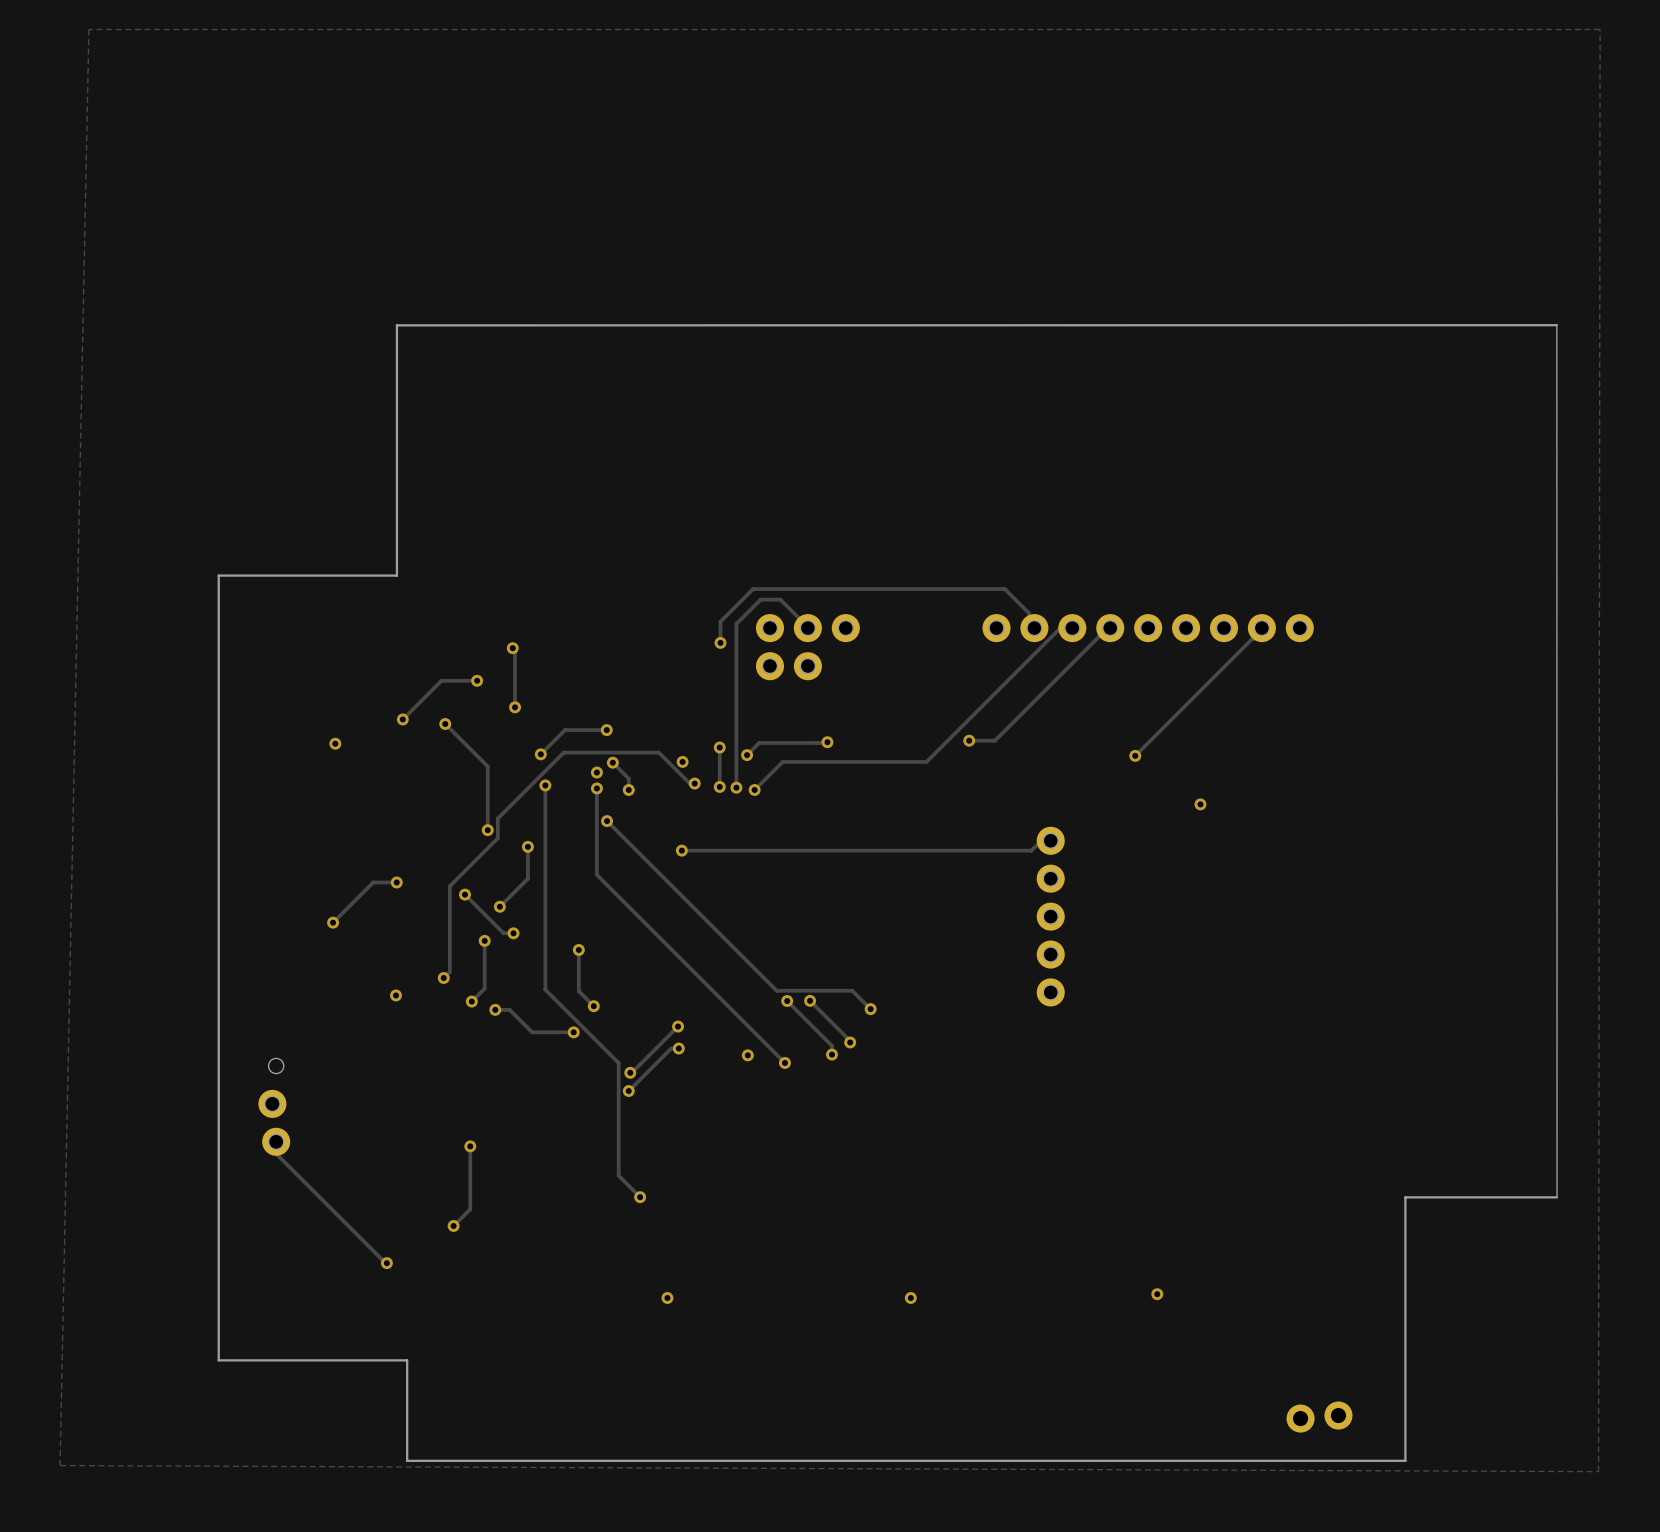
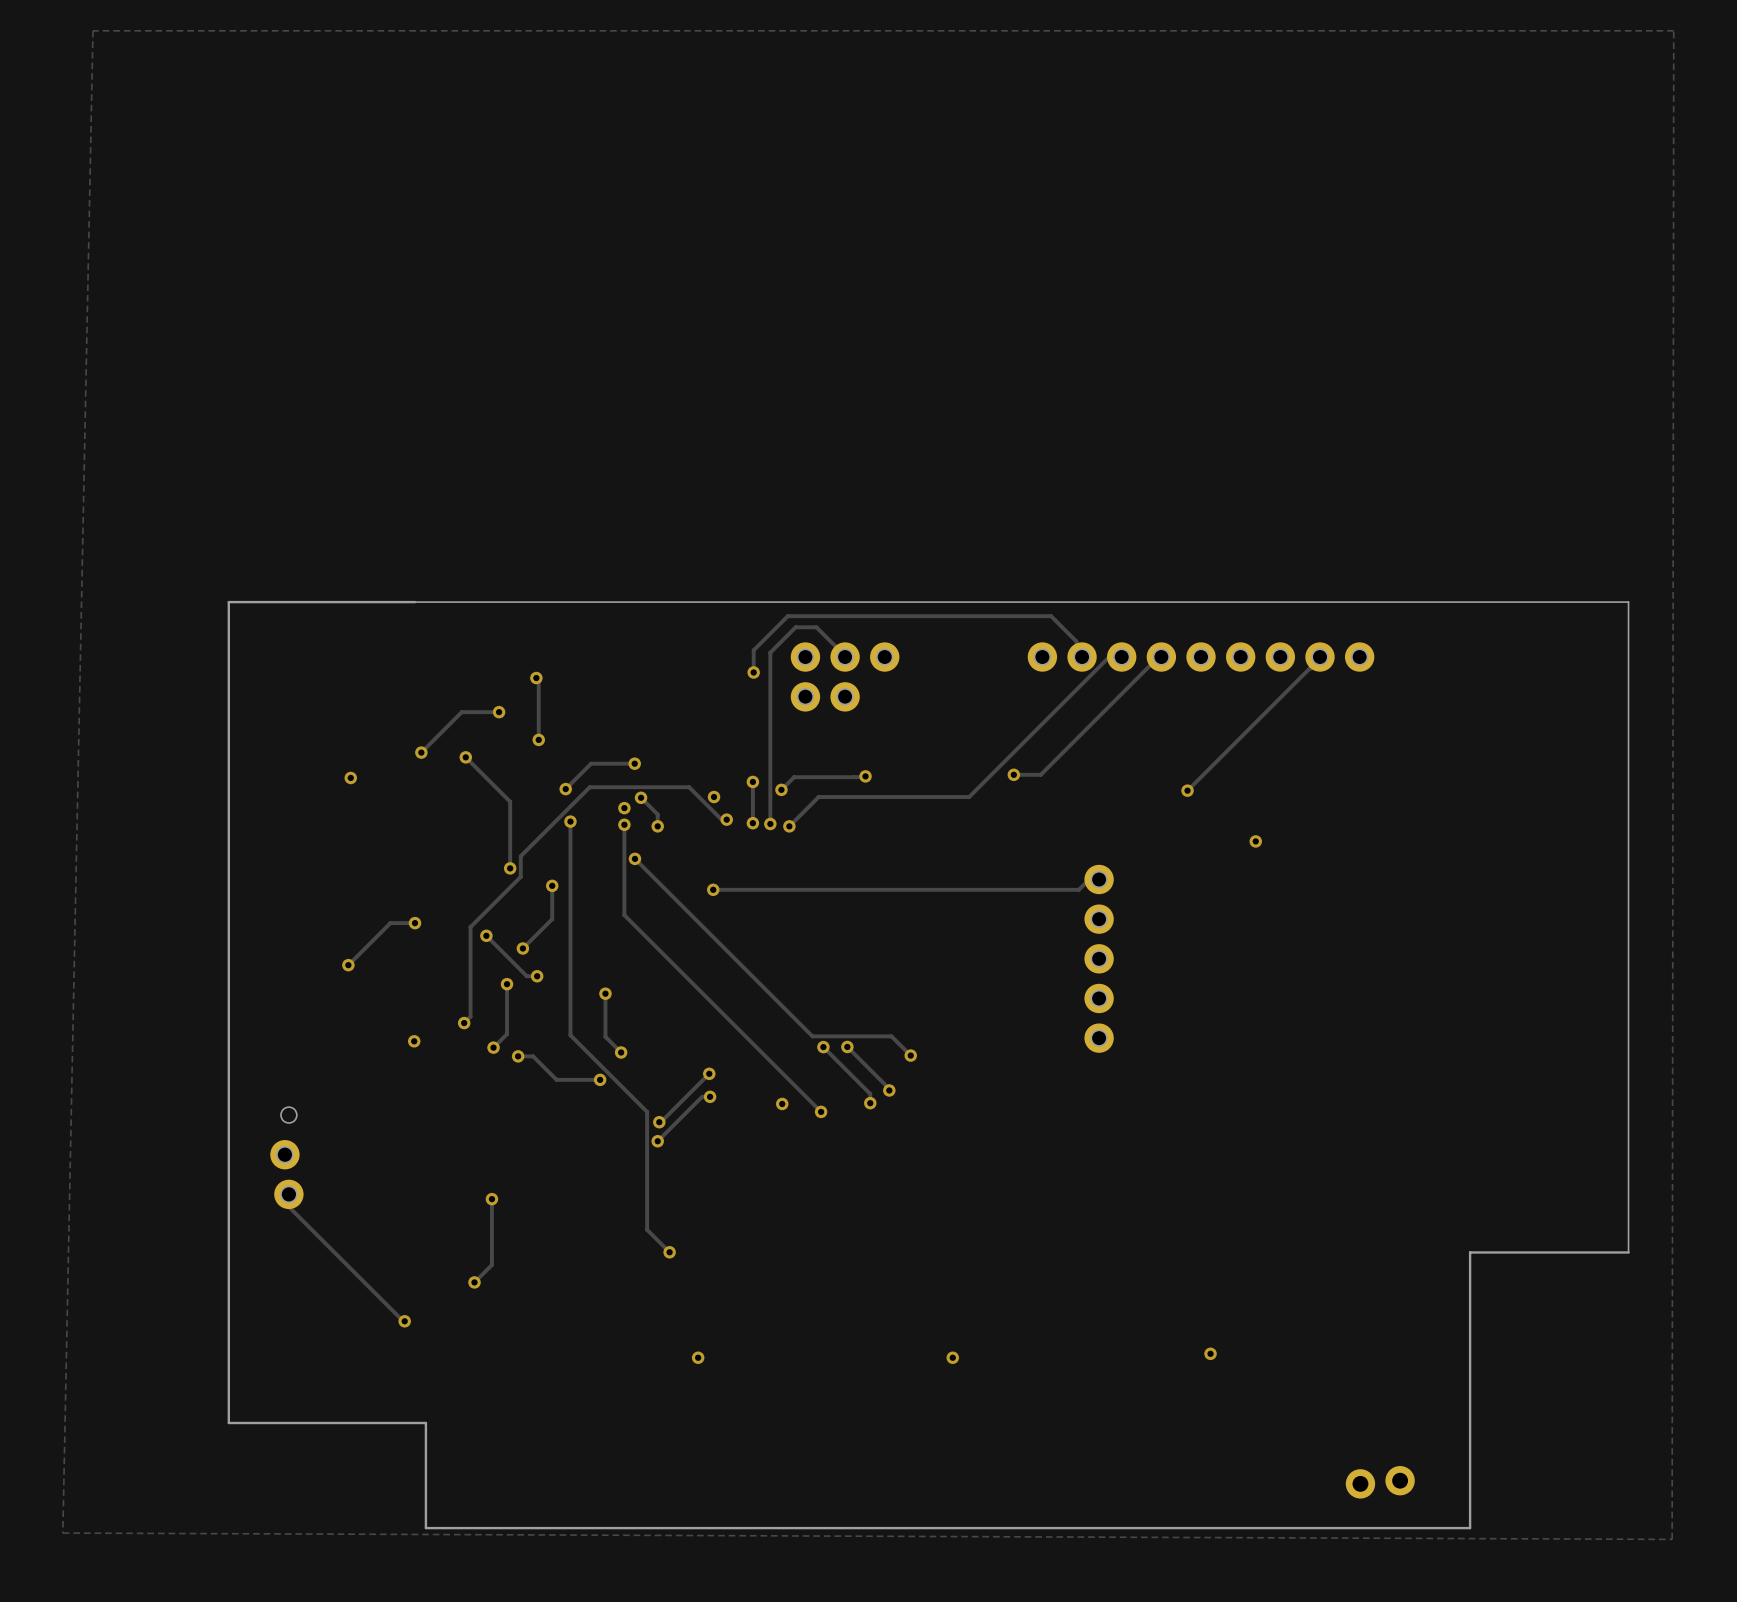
board edge: (396, 575) (396, 325) (1556, 325) (1557, 1197) -> (415, 602) (1628, 602) (1628, 1252)

